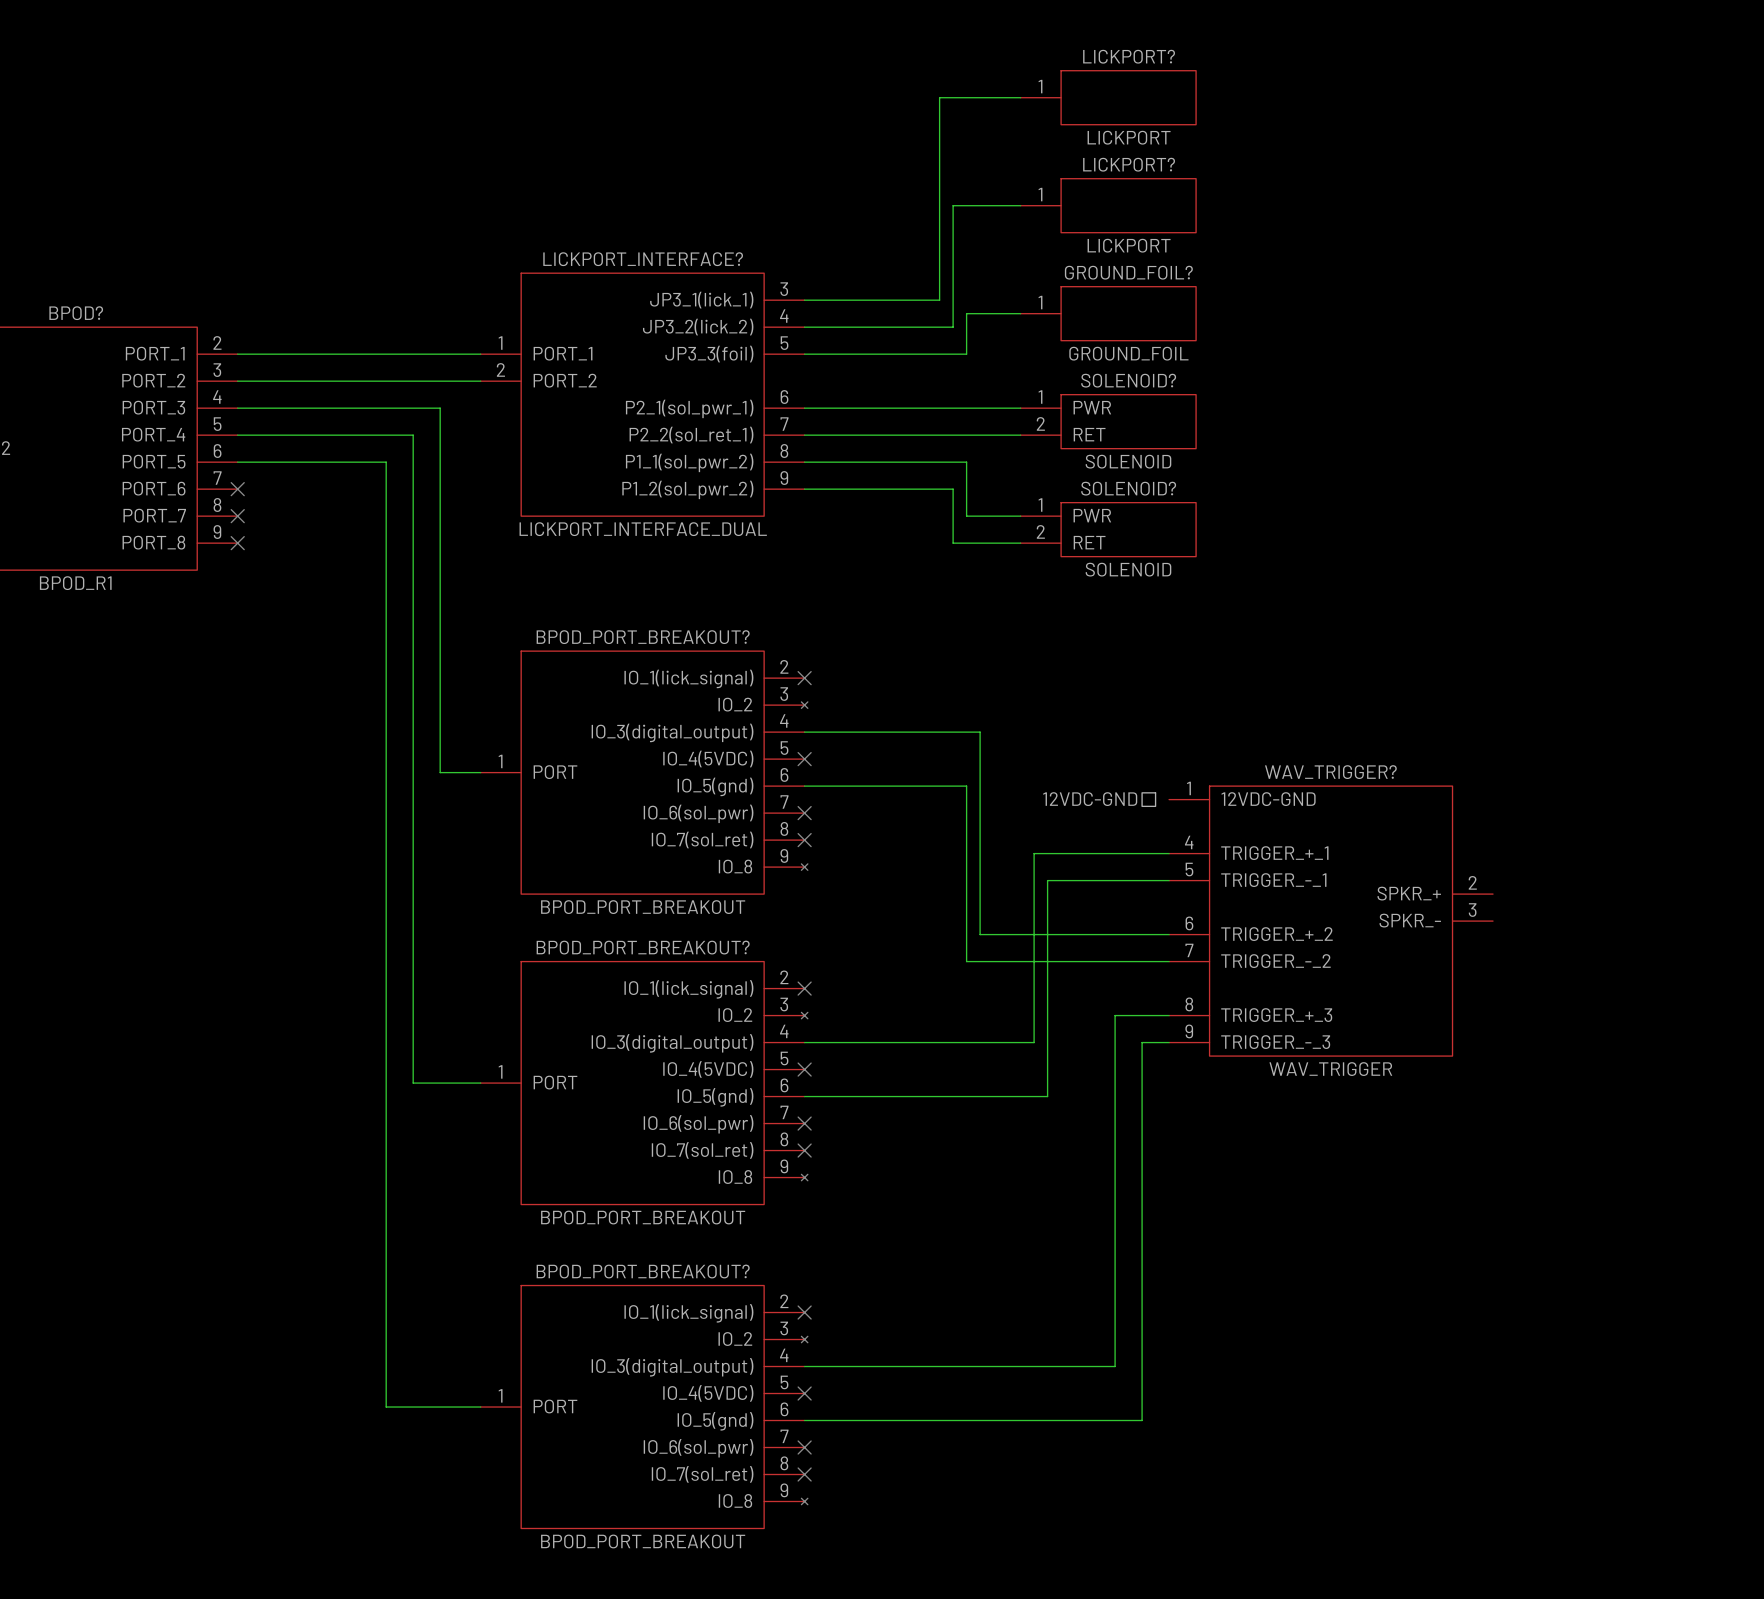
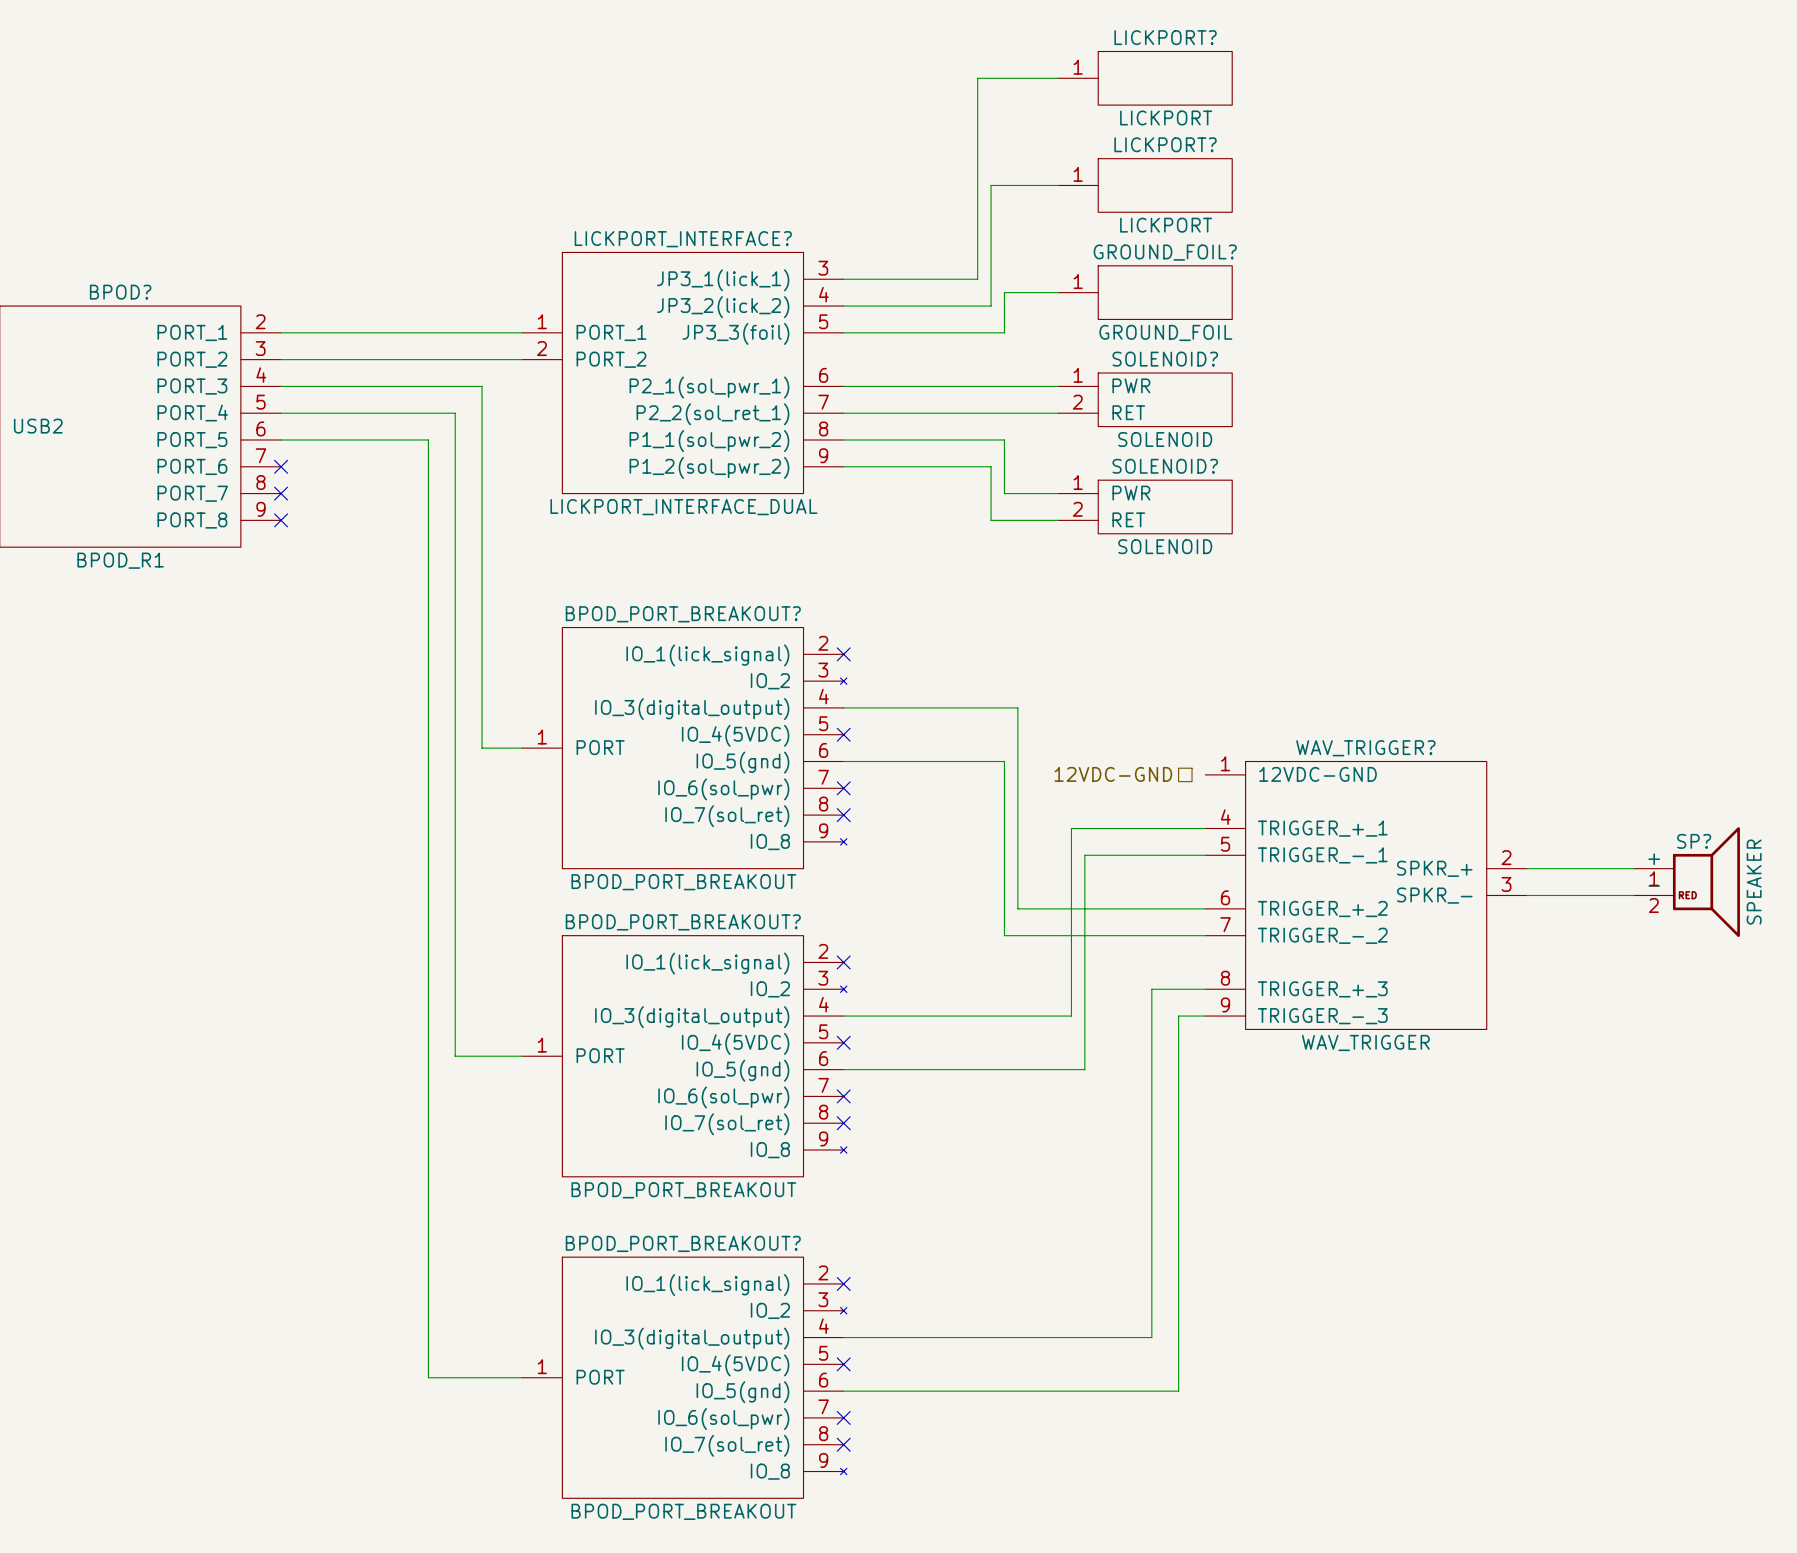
wire: none -> (1526, 868) (1634, 868)
SP?: none -> SPEAKER (1687, 882)
wire: none -> (1526, 895) (1634, 895)

